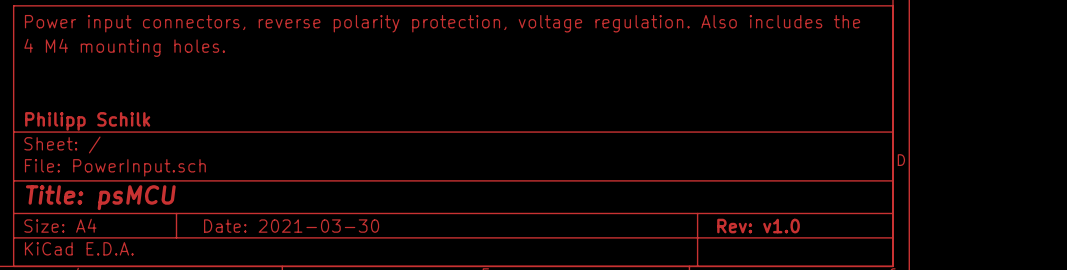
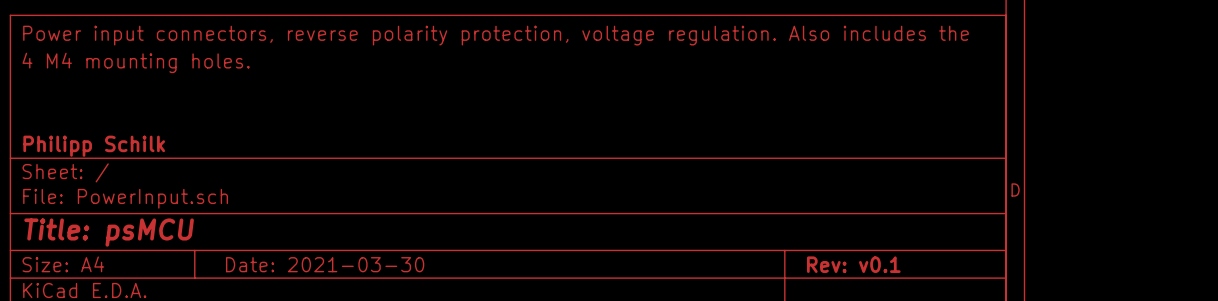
title block: Rev: v1.0 (758, 226) -> Rev: v0.1 (853, 264)

